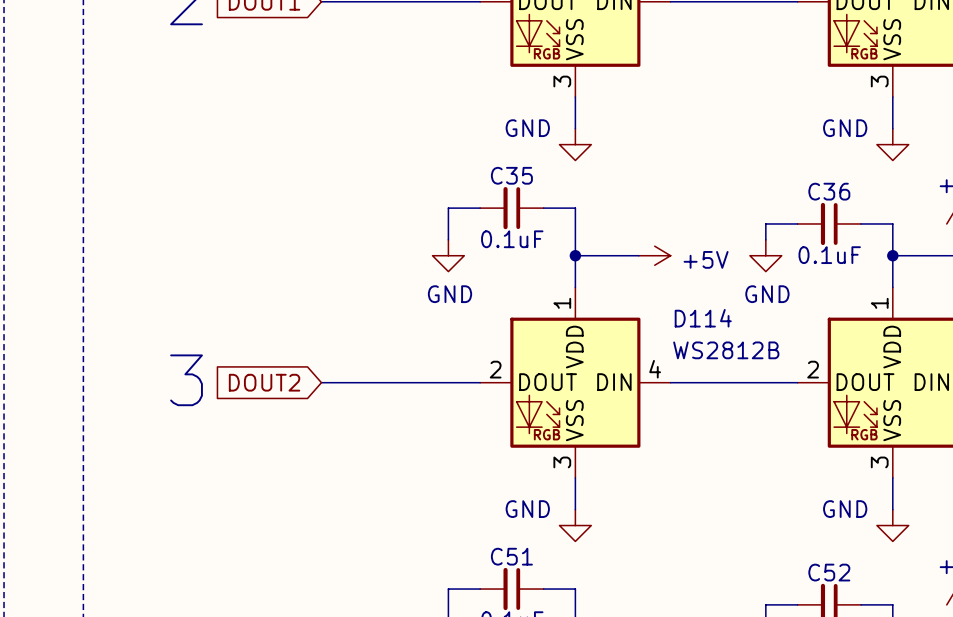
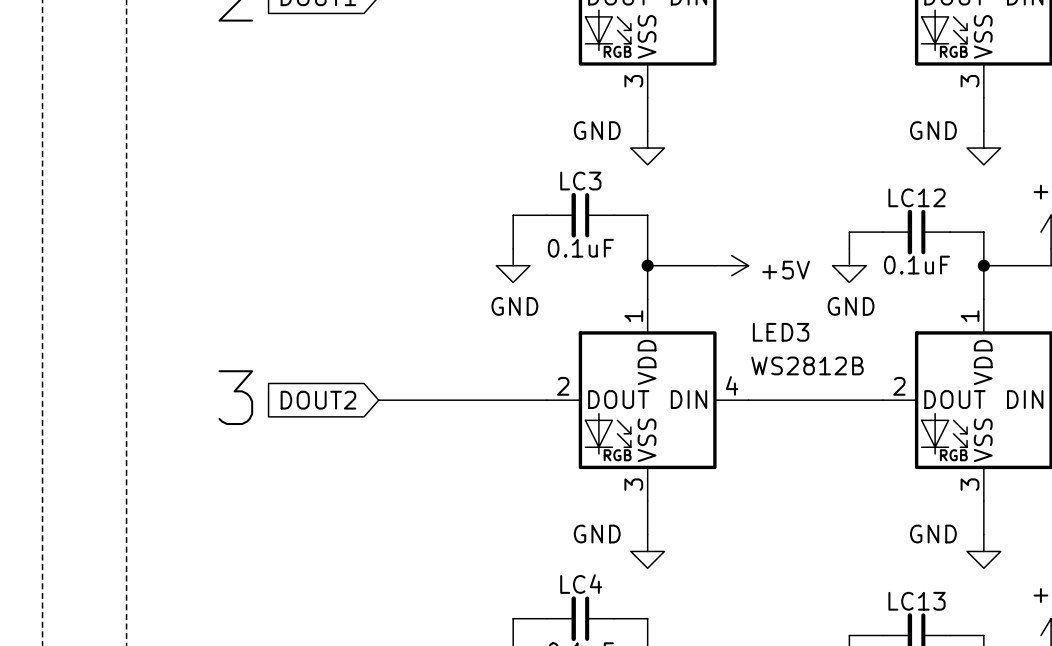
C35 name: C35 (511, 175) -> LC3 (580, 181)
C36 name: C36 (829, 191) -> LC12 (917, 197)
D114 name: D114 (703, 318) -> LED3 (781, 332)
C51 name: C51 (511, 556) -> LC4 (581, 584)
C52 name: C52 (829, 572) -> LC13 (917, 601)

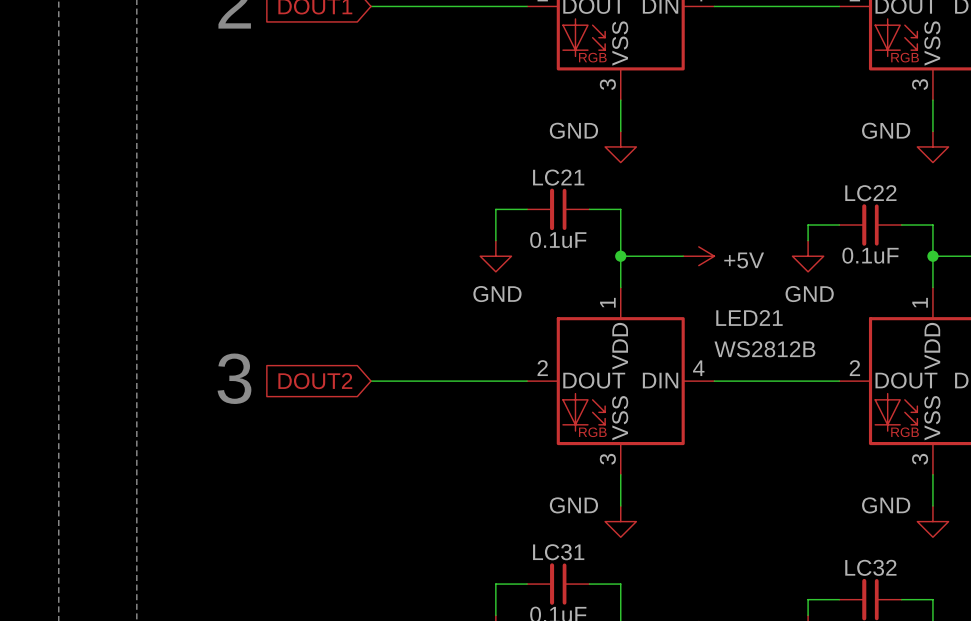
LC3 name: LC3 (580, 181) -> LC21 (558, 177)
LC12 name: LC12 (917, 197) -> LC22 (870, 193)
LED3 name: LED3 (781, 332) -> LED21 (749, 317)
LC4 name: LC4 (581, 584) -> LC31 (558, 552)
LC13 name: LC13 (917, 601) -> LC32 (870, 567)

